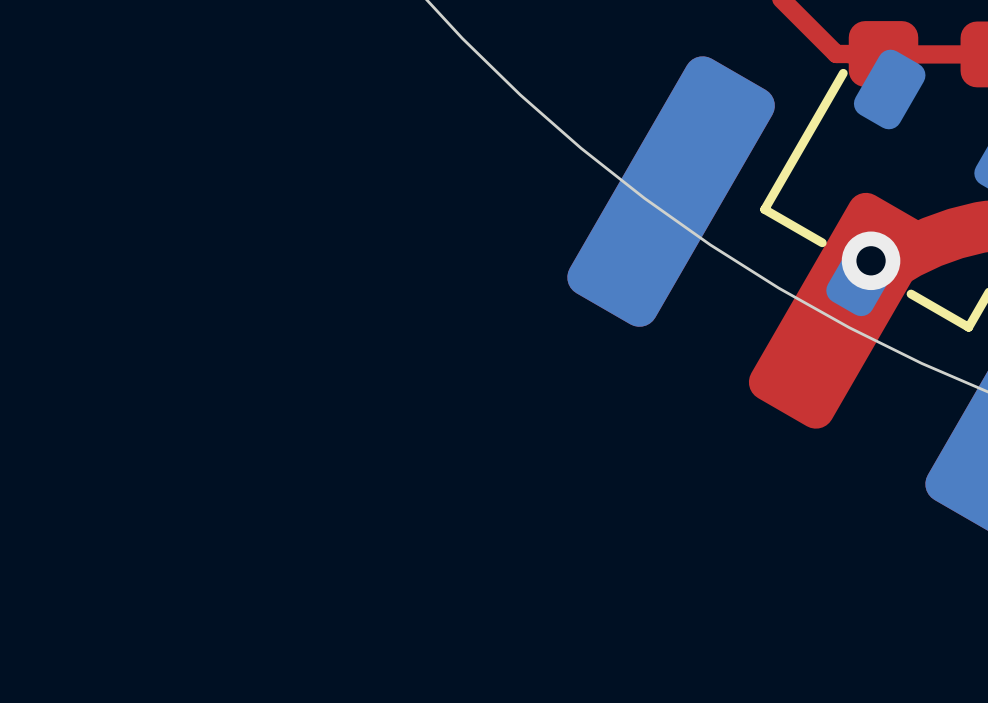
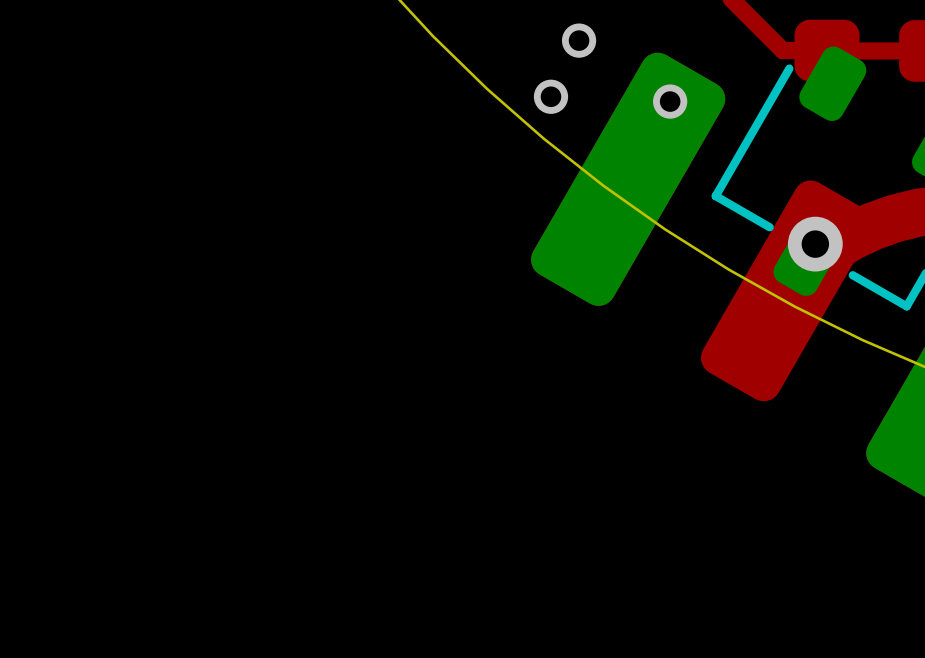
via: none -> (579, 40)
via: none -> (550, 96)
via: none -> (670, 101)

